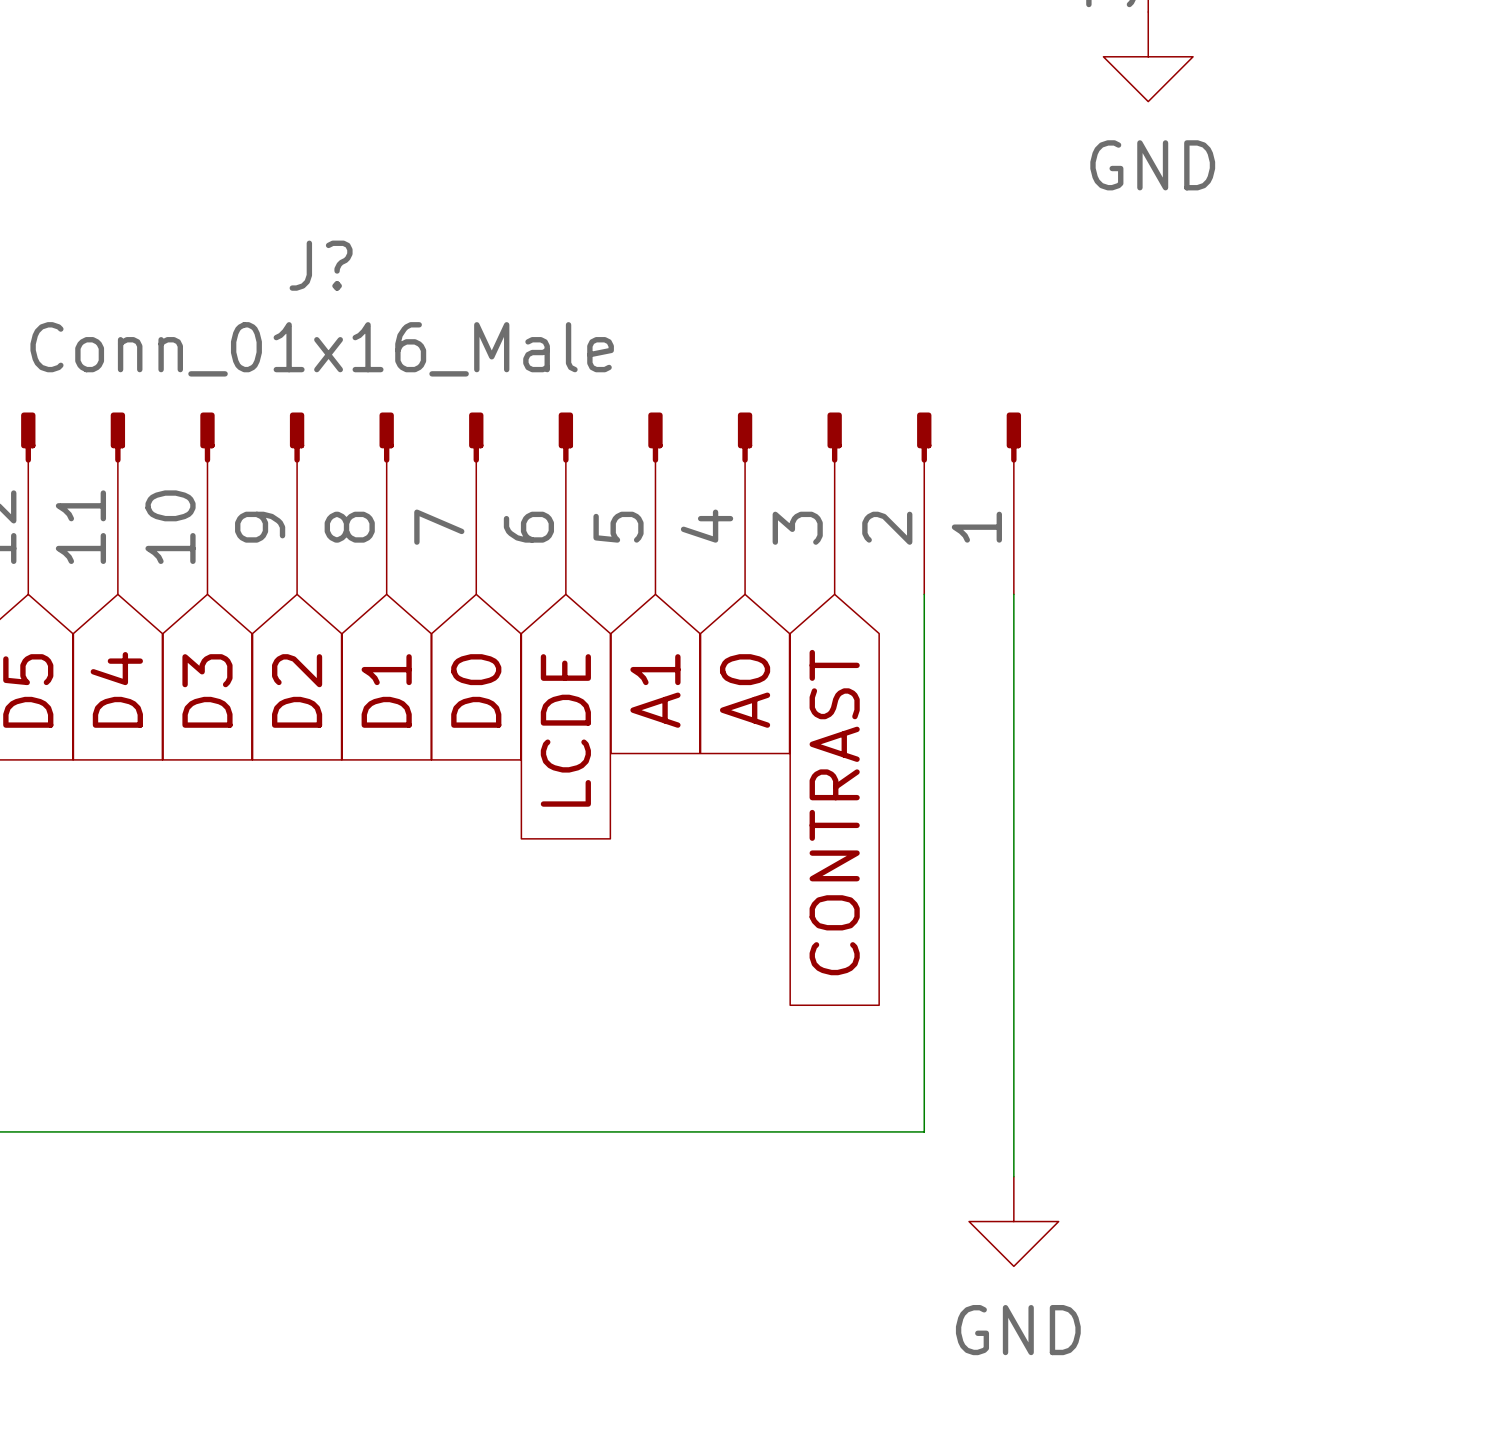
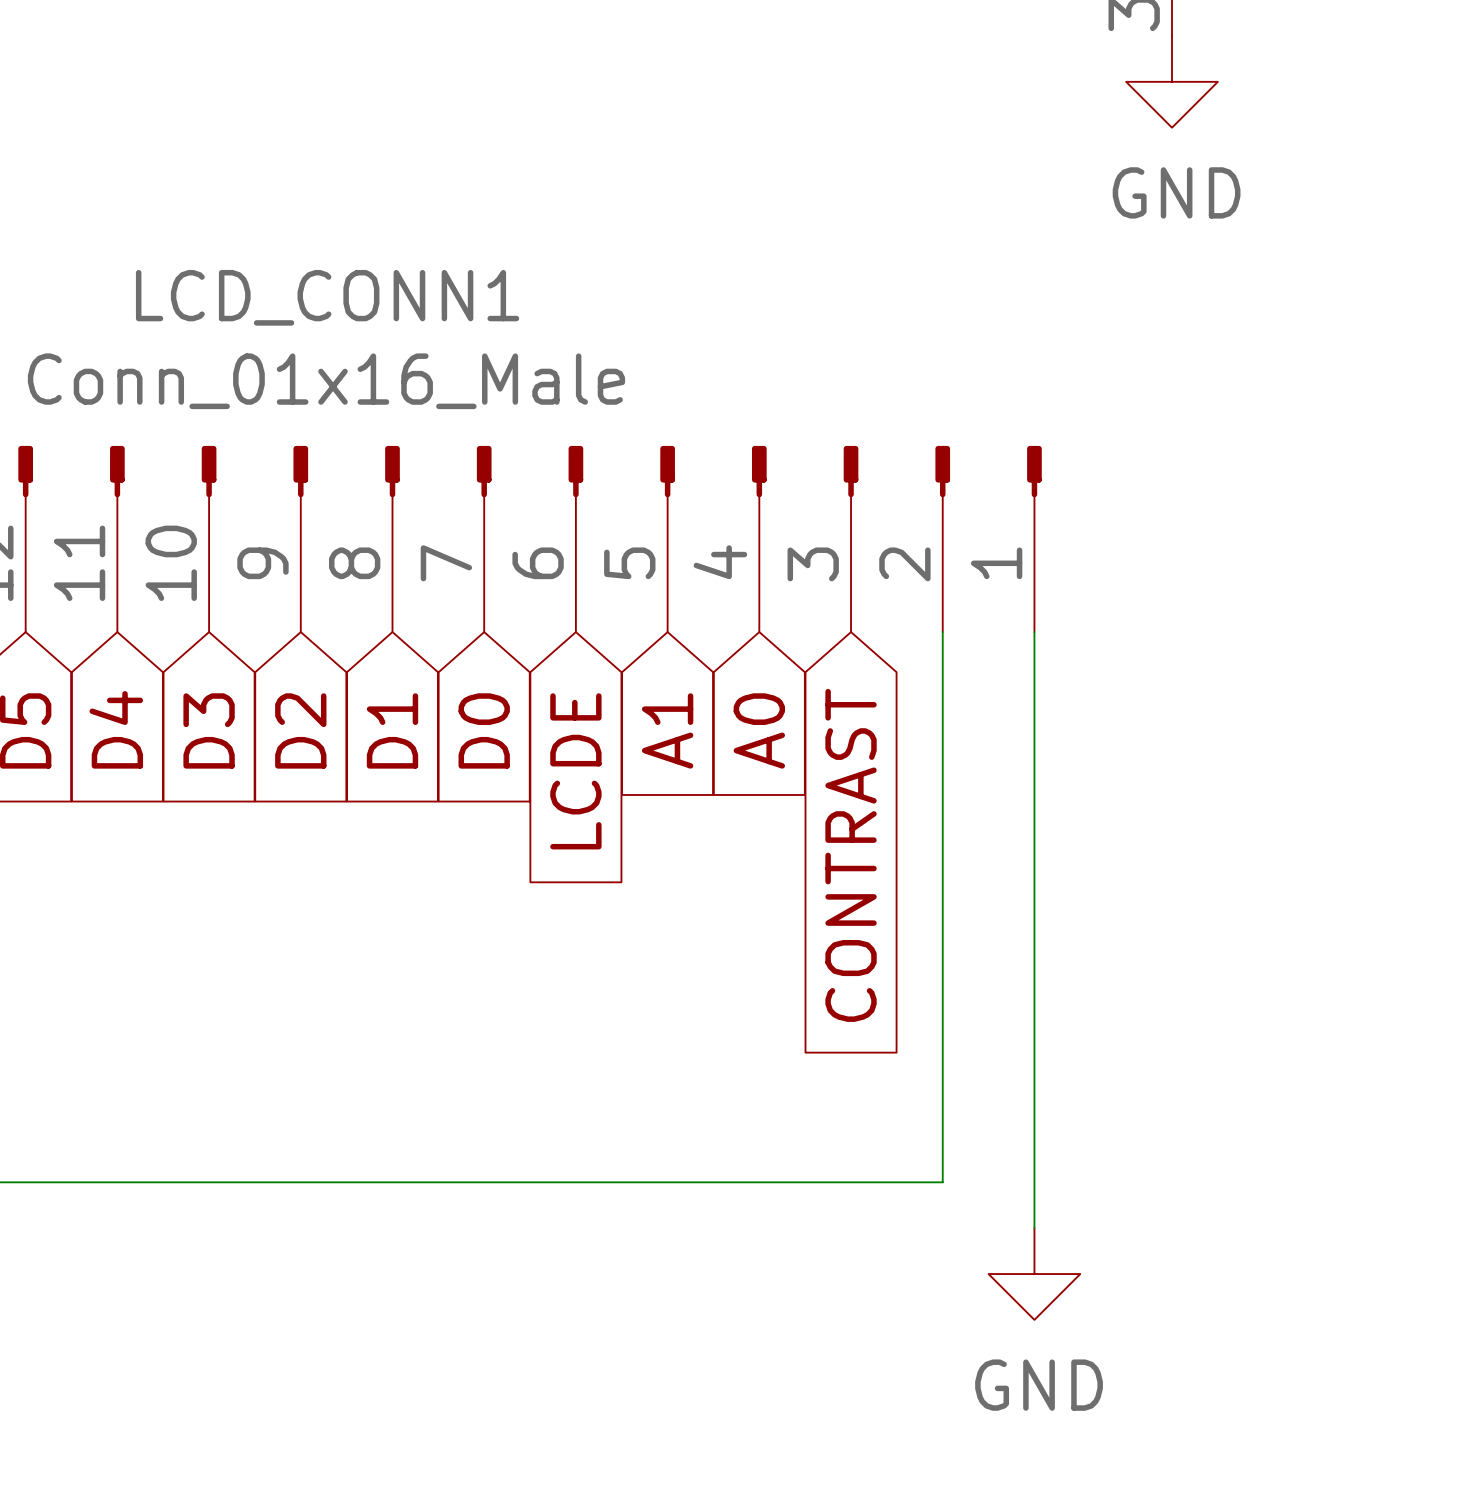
J? name: J? (321, 265) -> LCD_CONN1 (327, 297)

